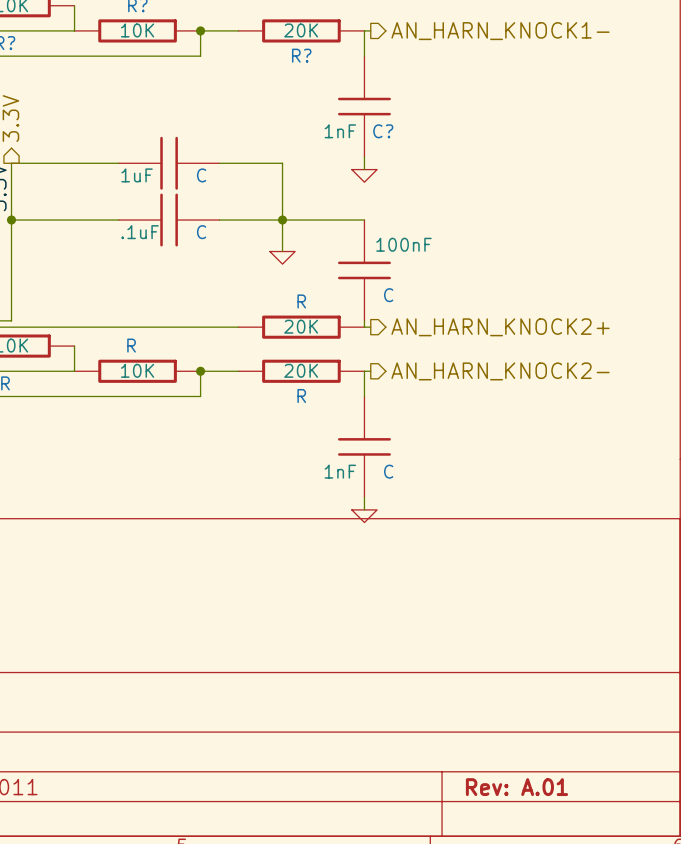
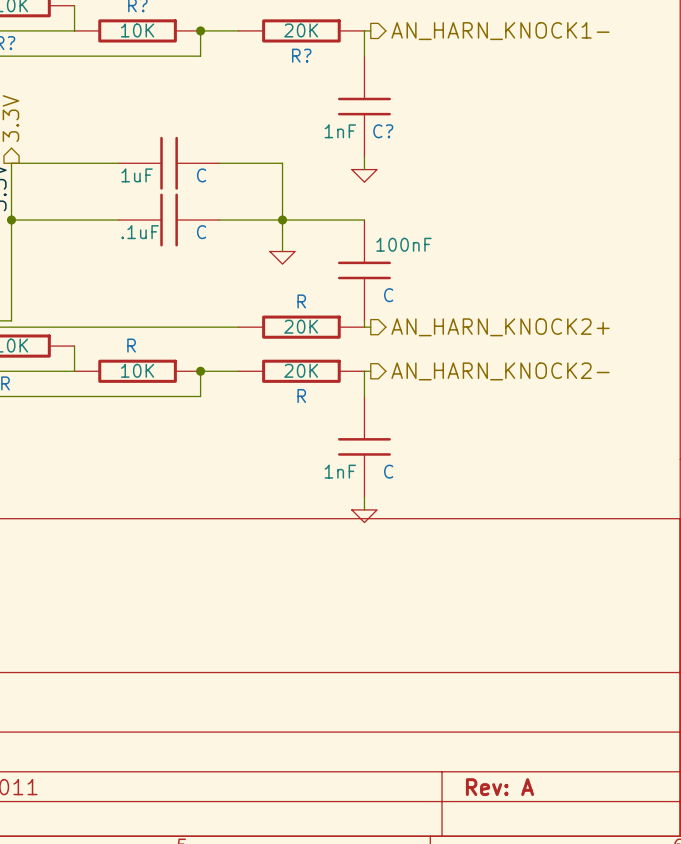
title block: Rev: A.01 (517, 787) -> Rev: A (499, 787)

